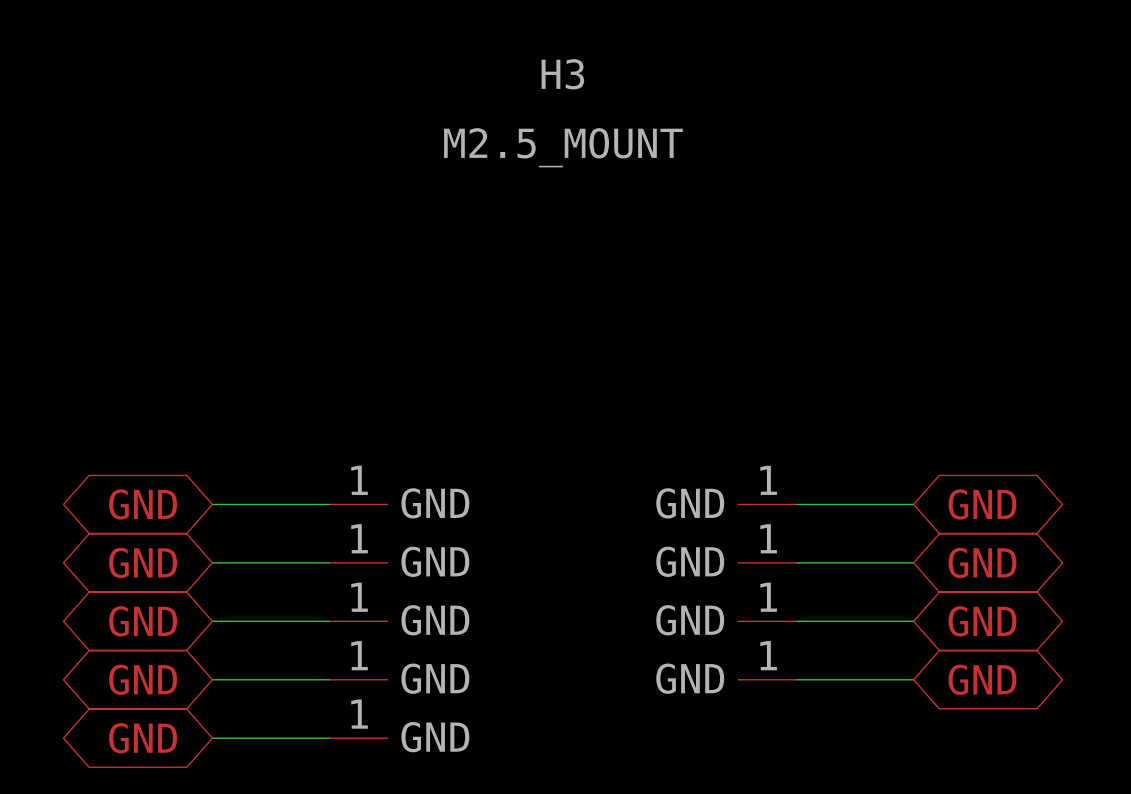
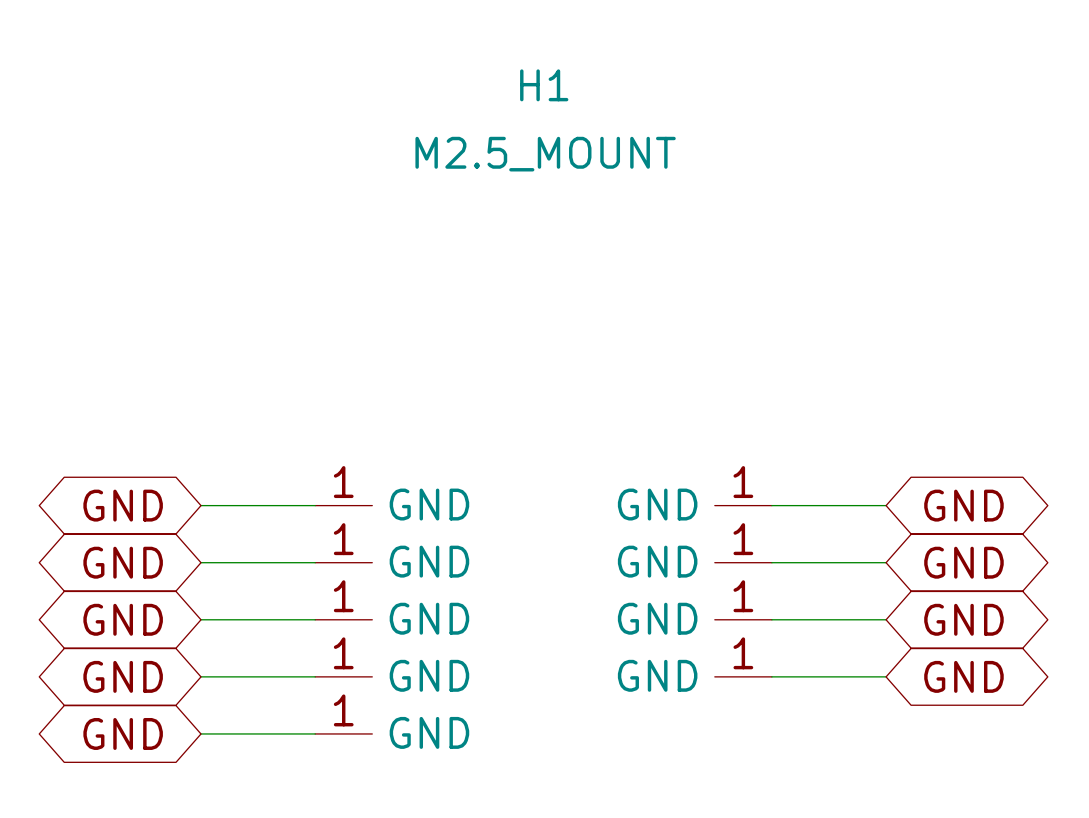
H3 name: H3 (562, 74) -> H1 (544, 85)

